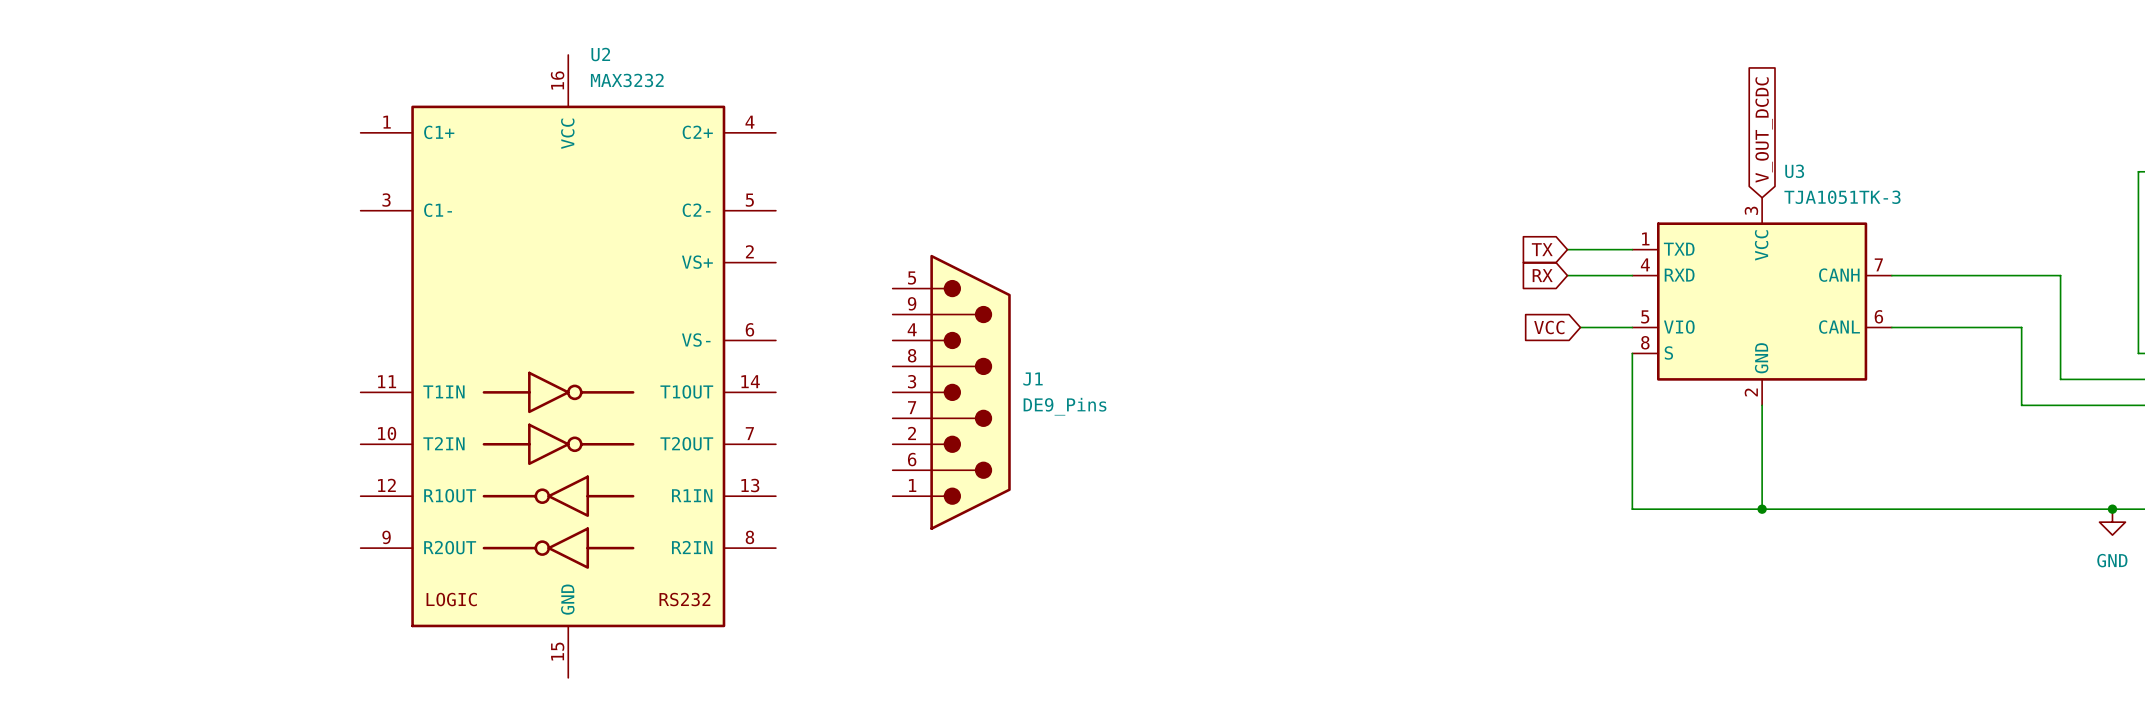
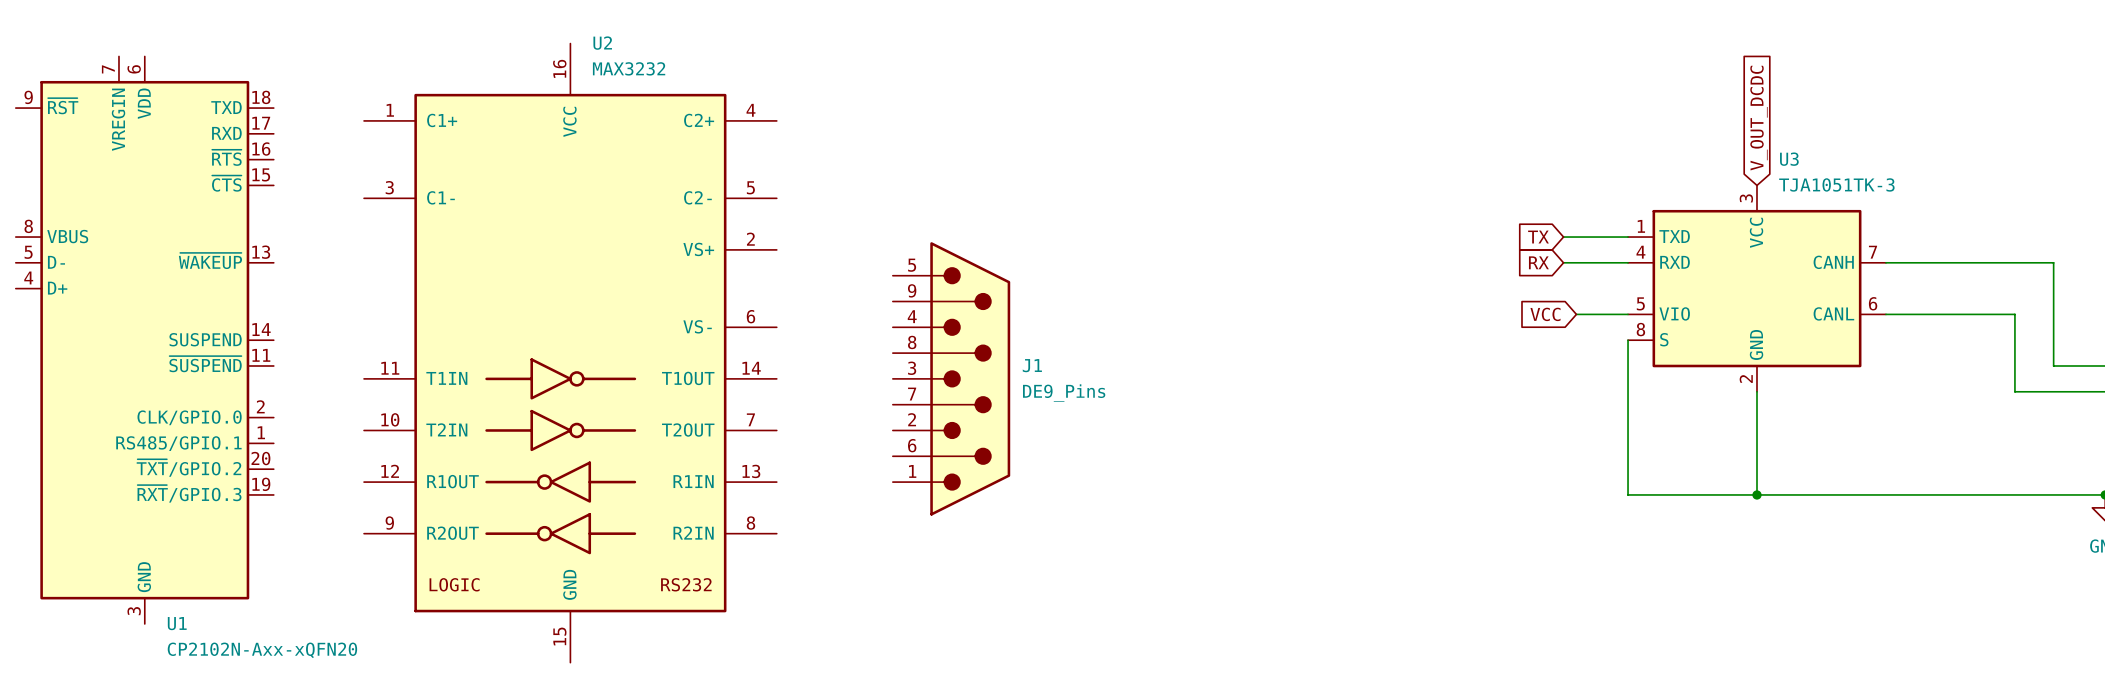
U1: none -> CP2102N-Axx-xQFN20 (144, 340)

